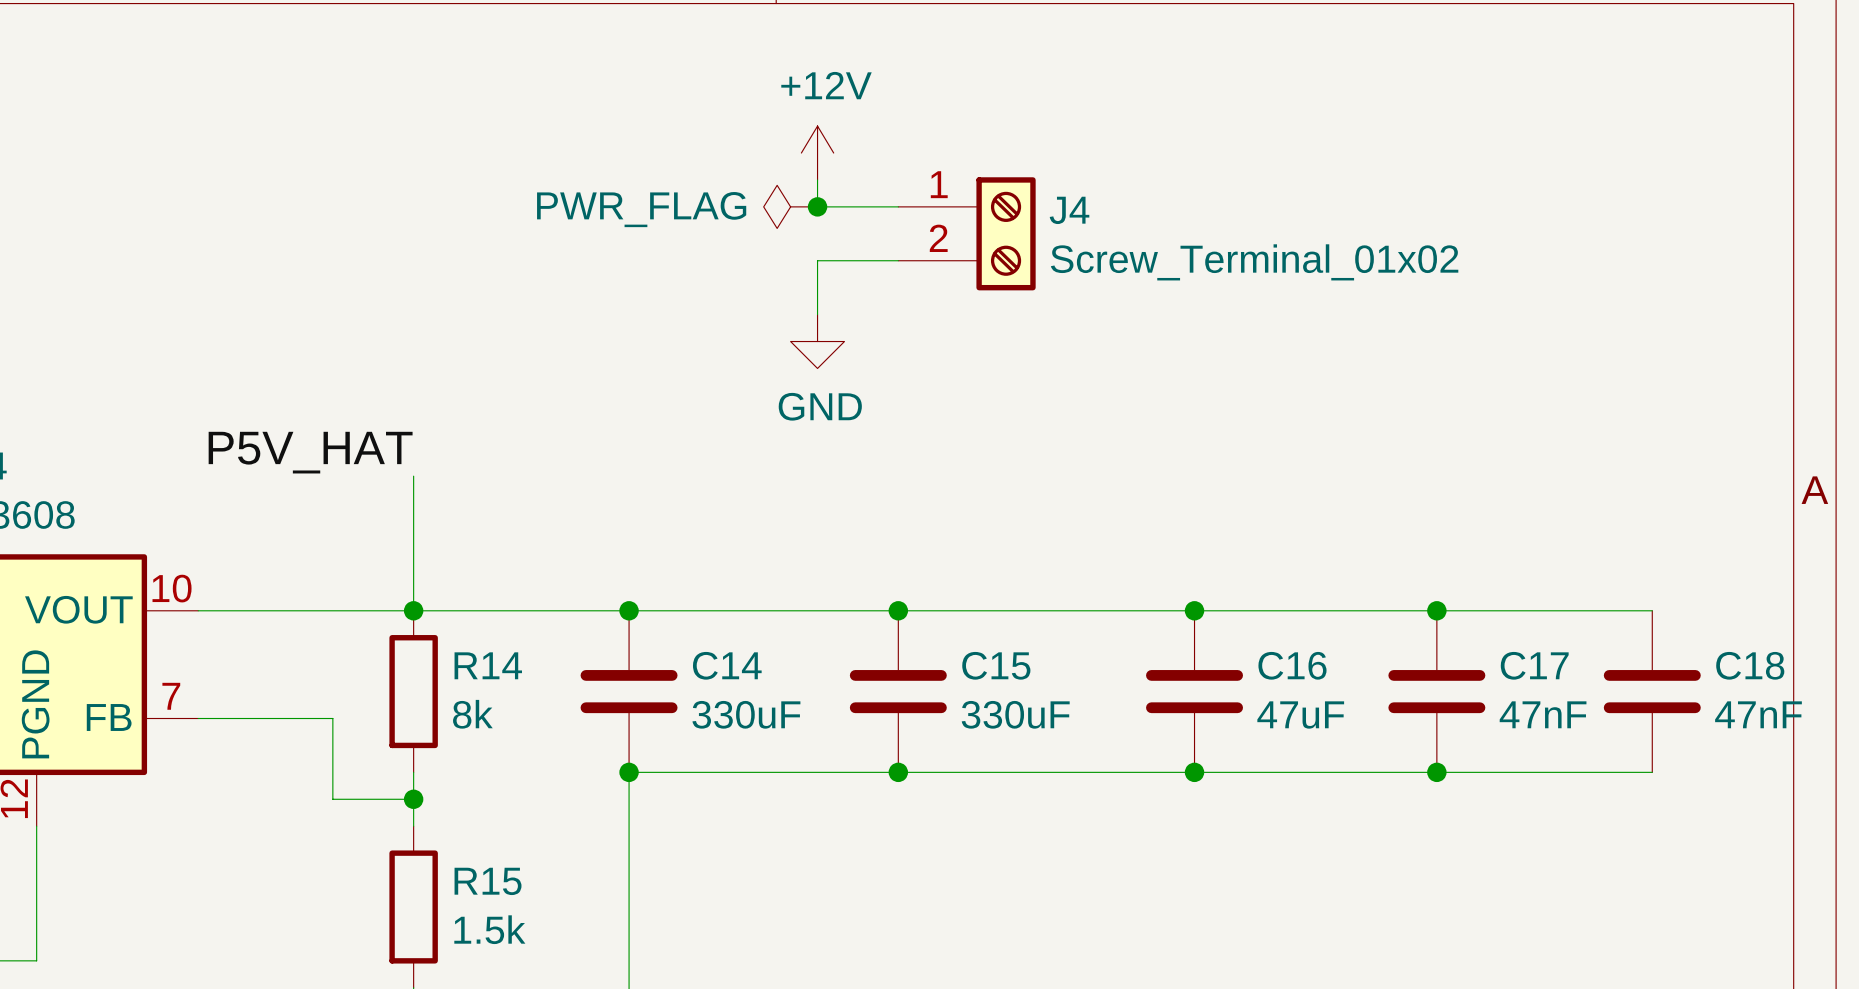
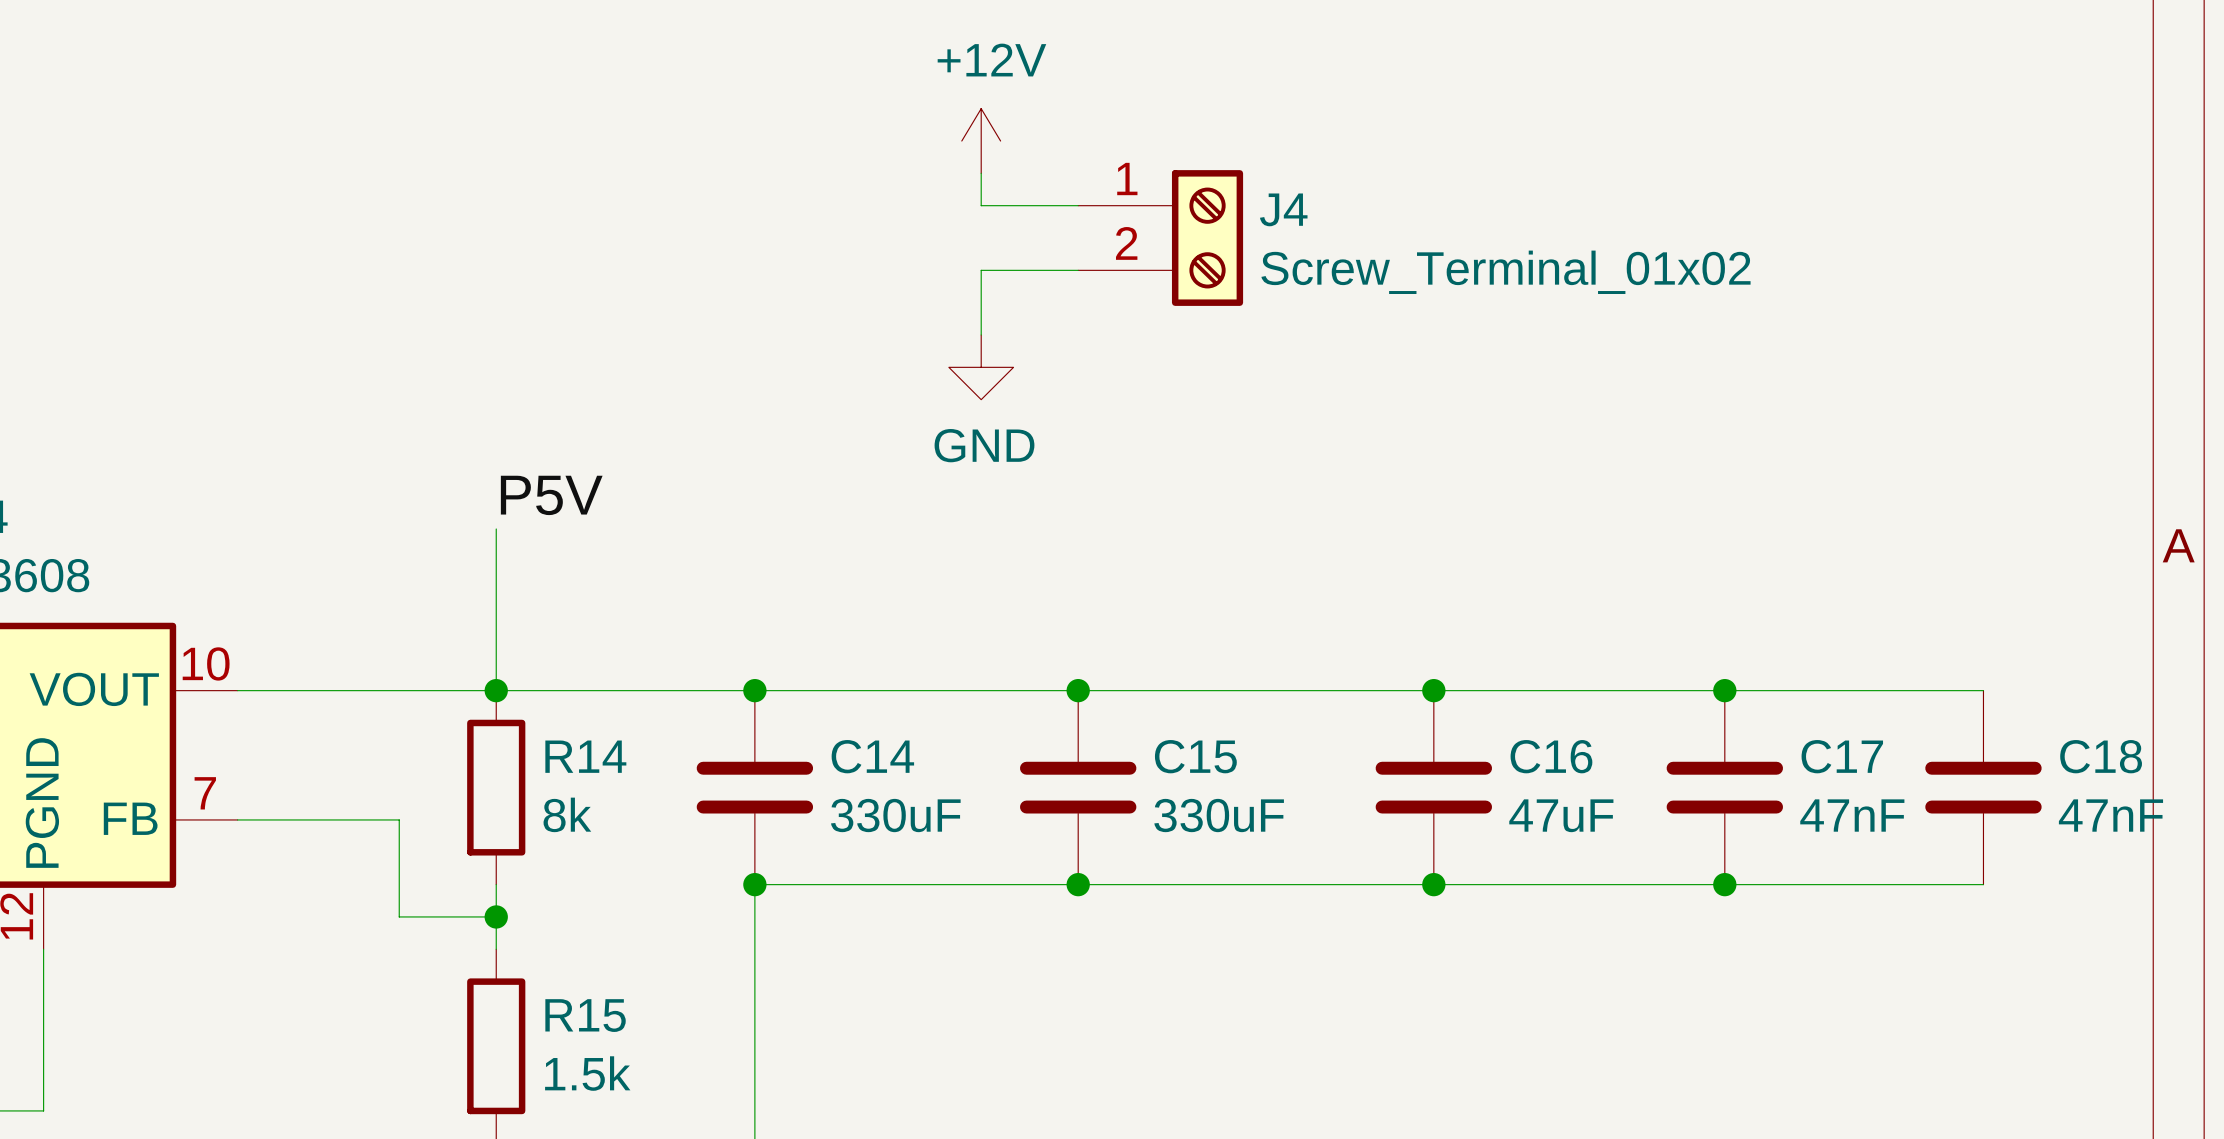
power symbol: PWR_FLAG (790, 206) -> none
junction: (817, 206) -> none
label: P5V_HAT (310, 452) -> P5V (551, 495)

